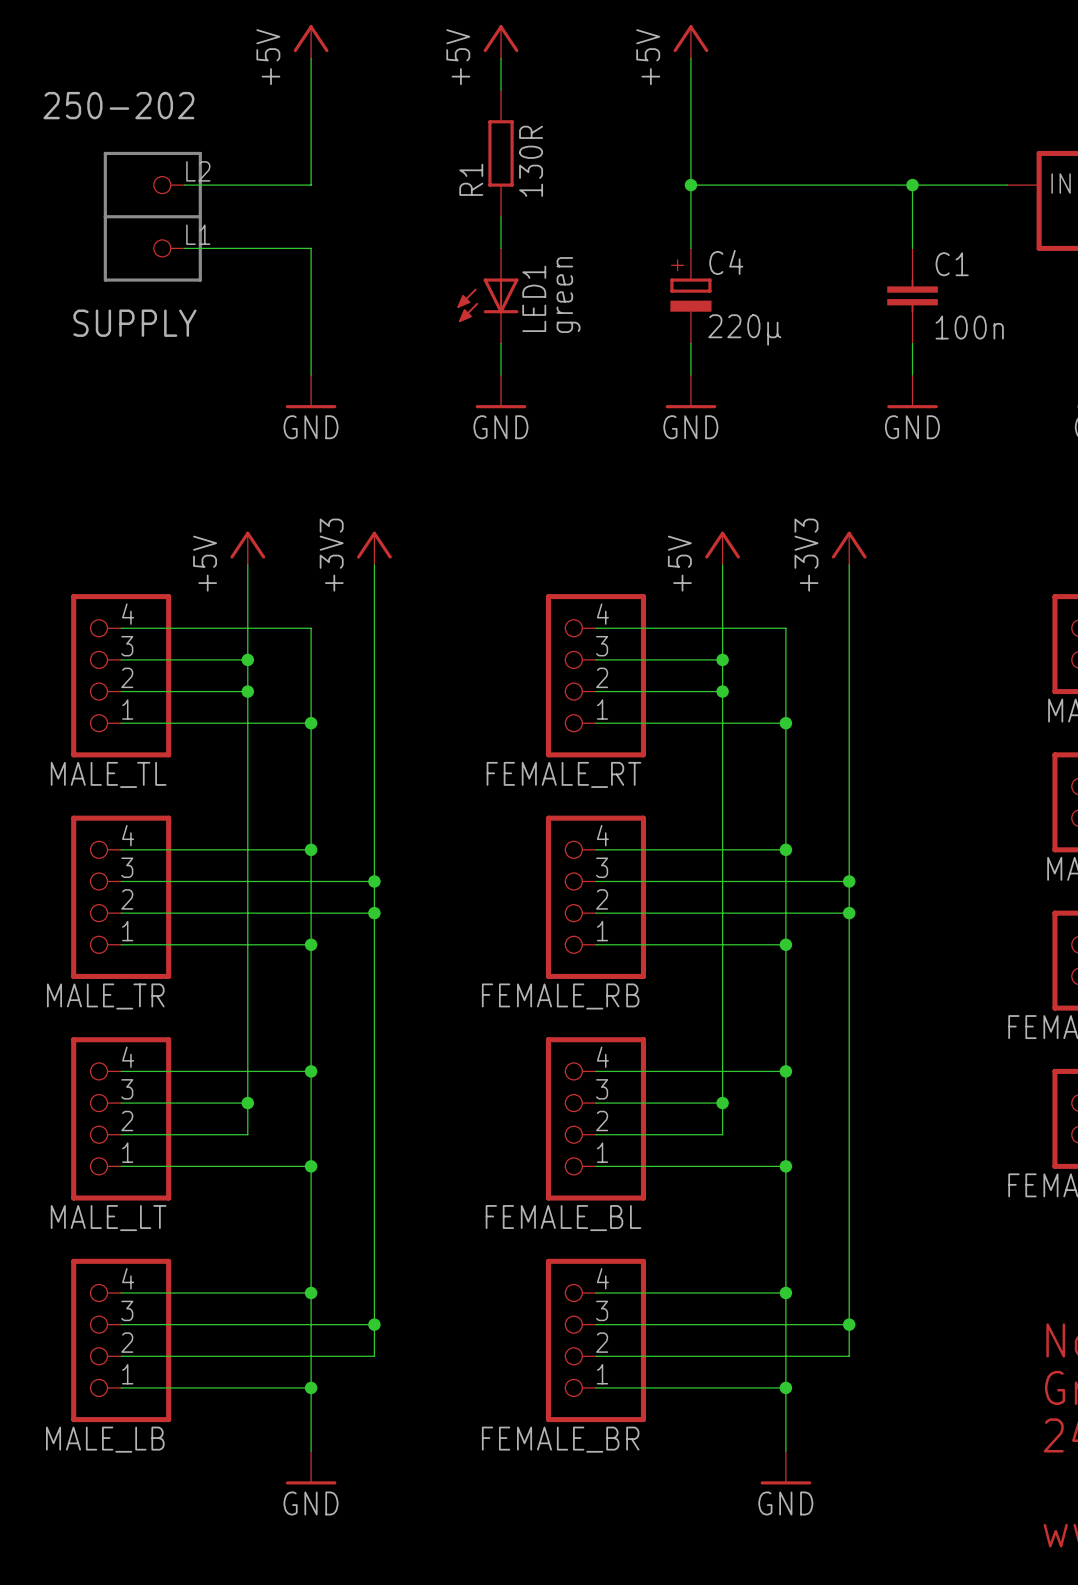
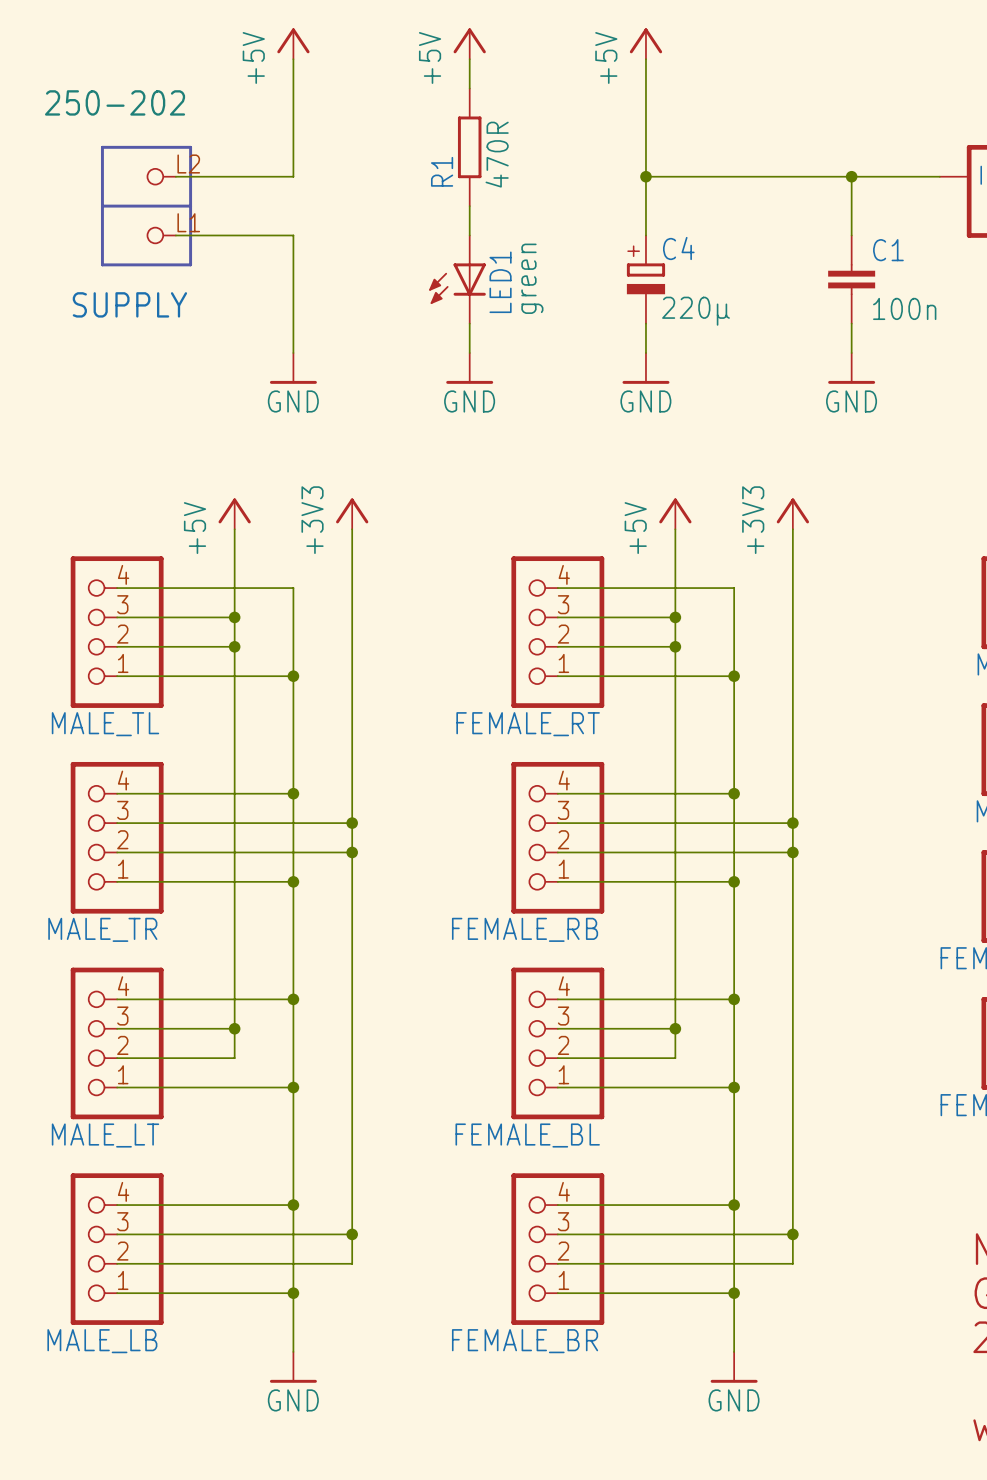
R1 value: 130R (531, 161) -> 470R (497, 154)

